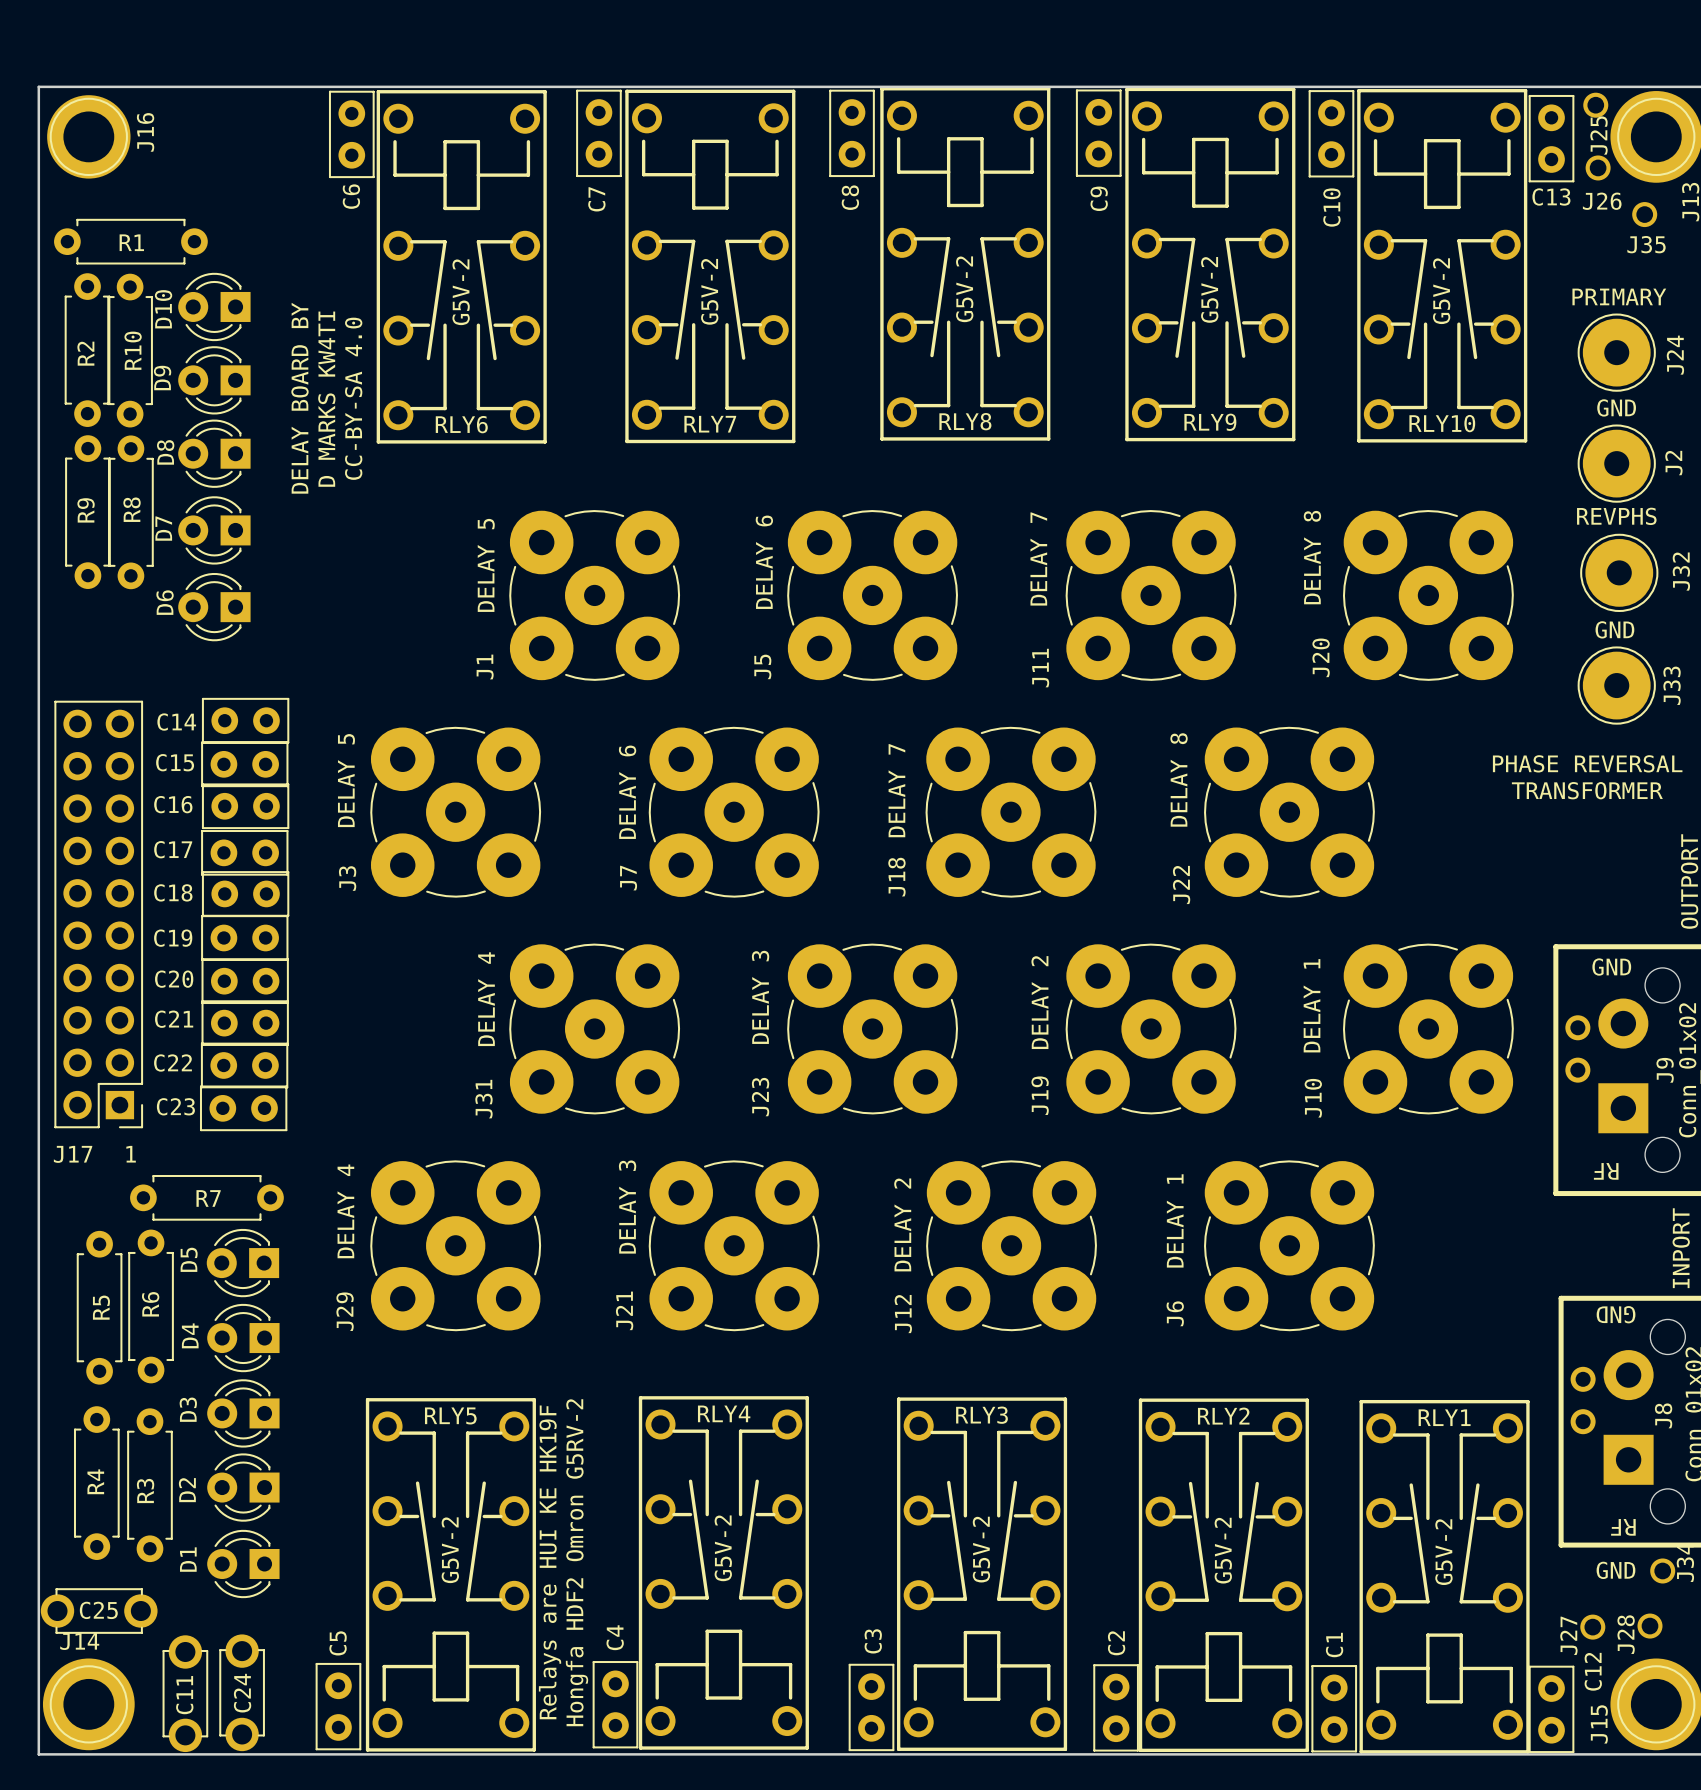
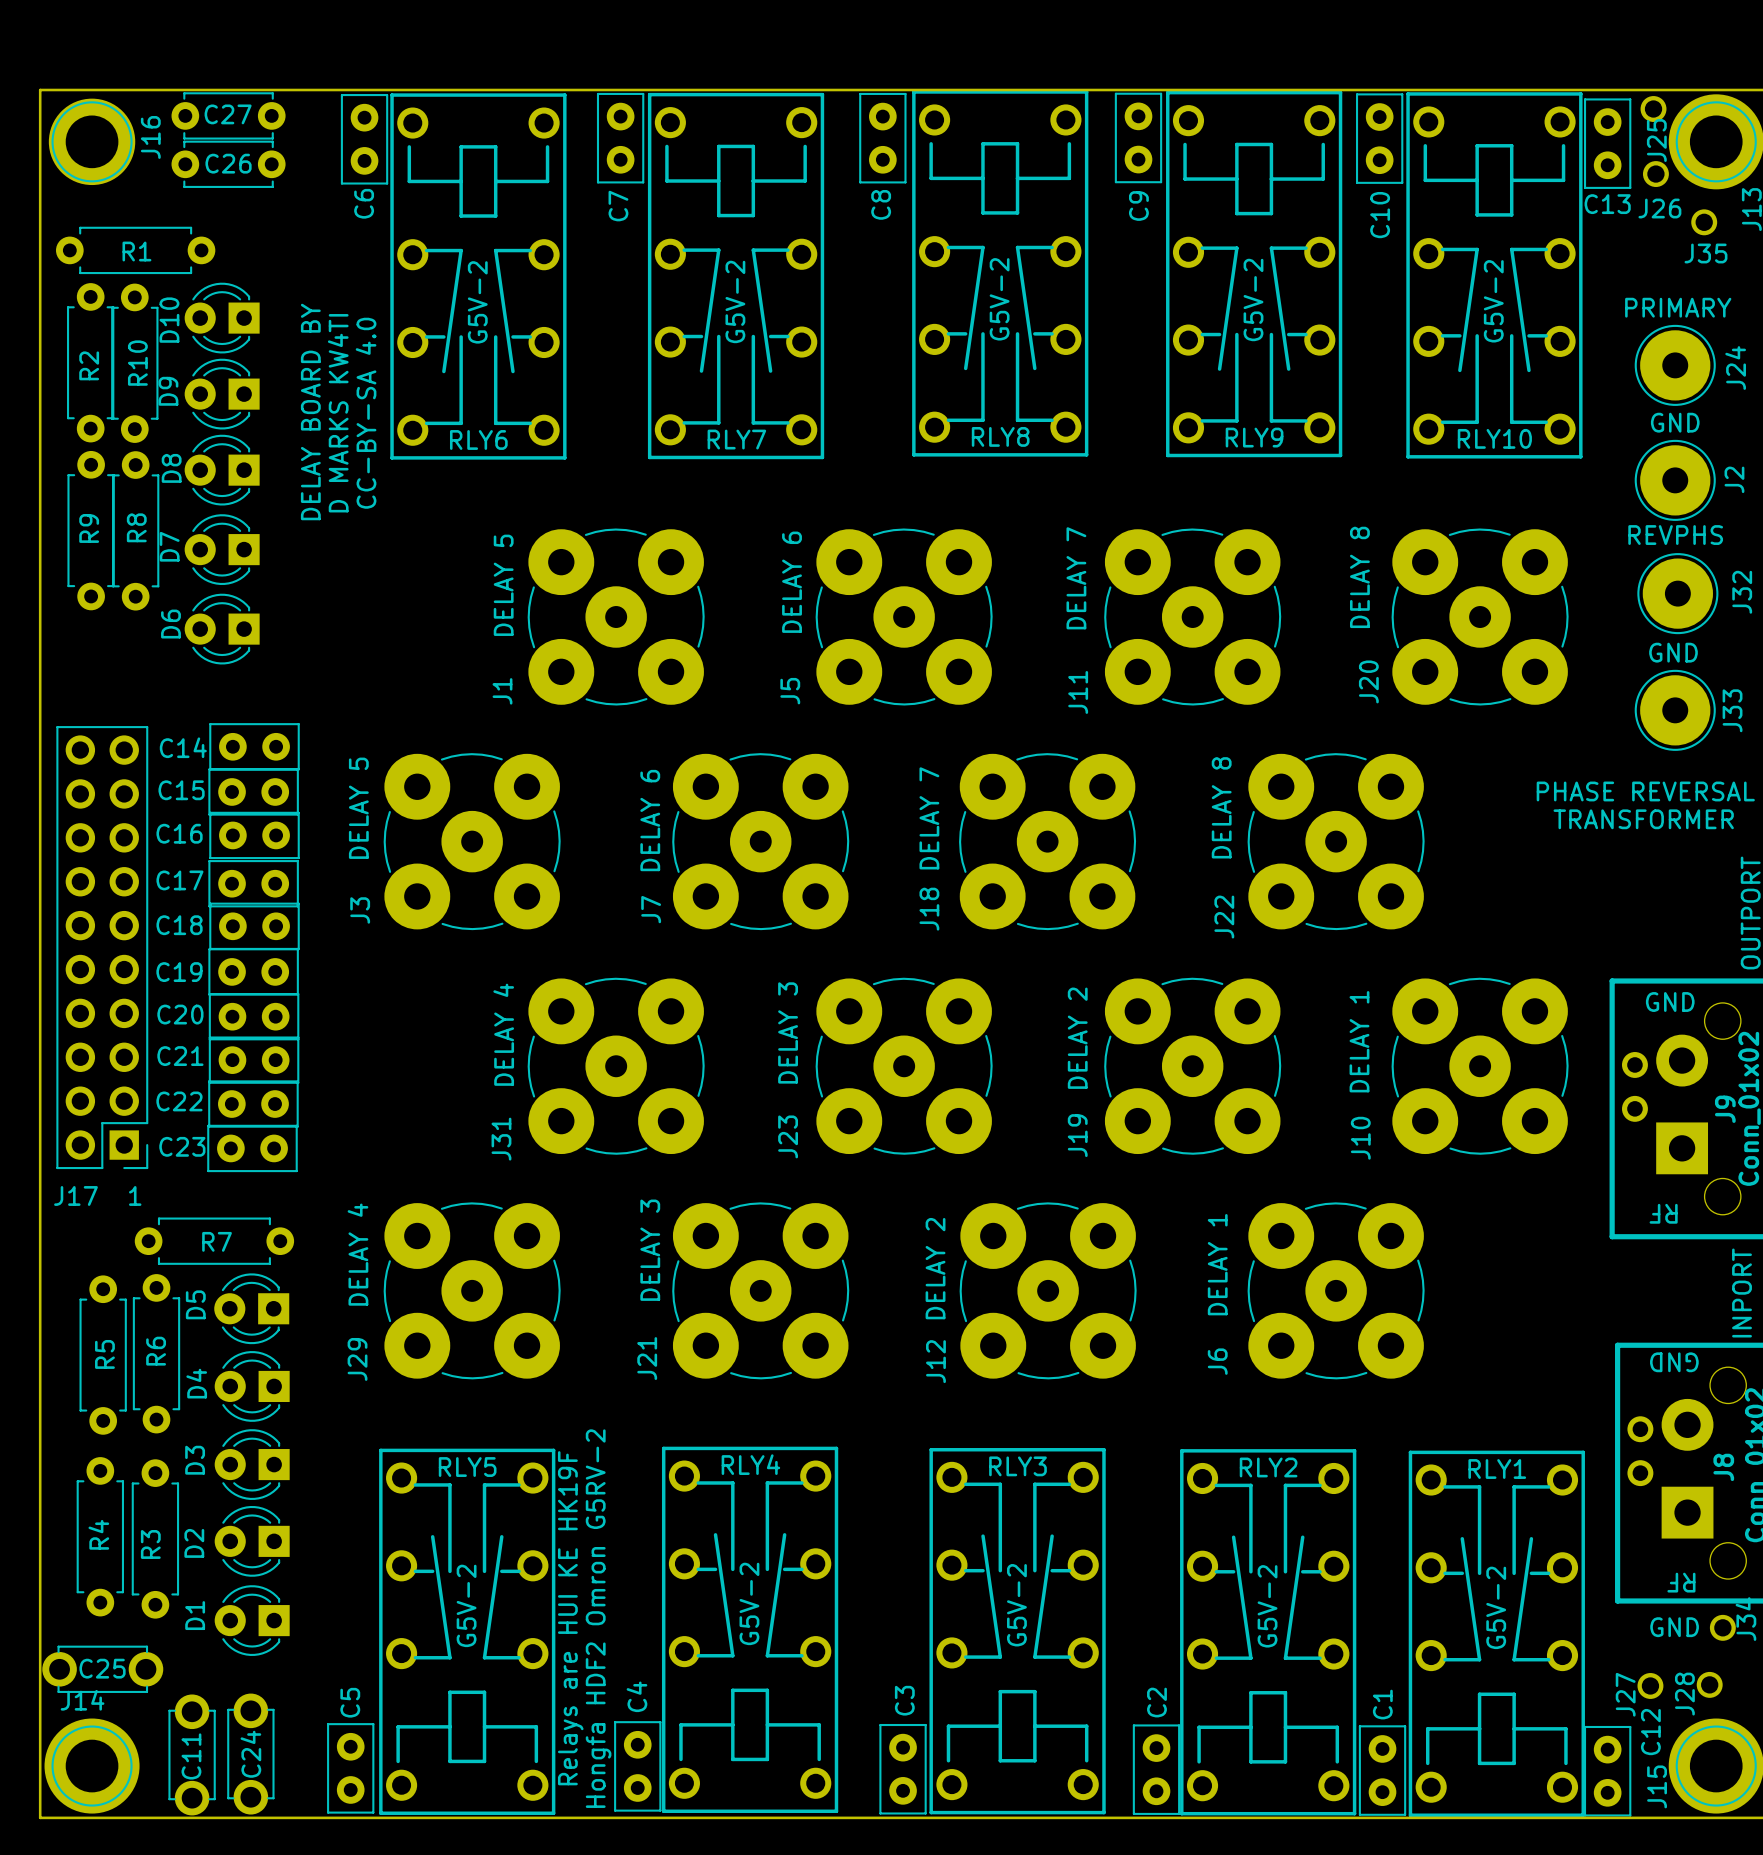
C27: none -> (228, 115)
C26: none -> (228, 164)

